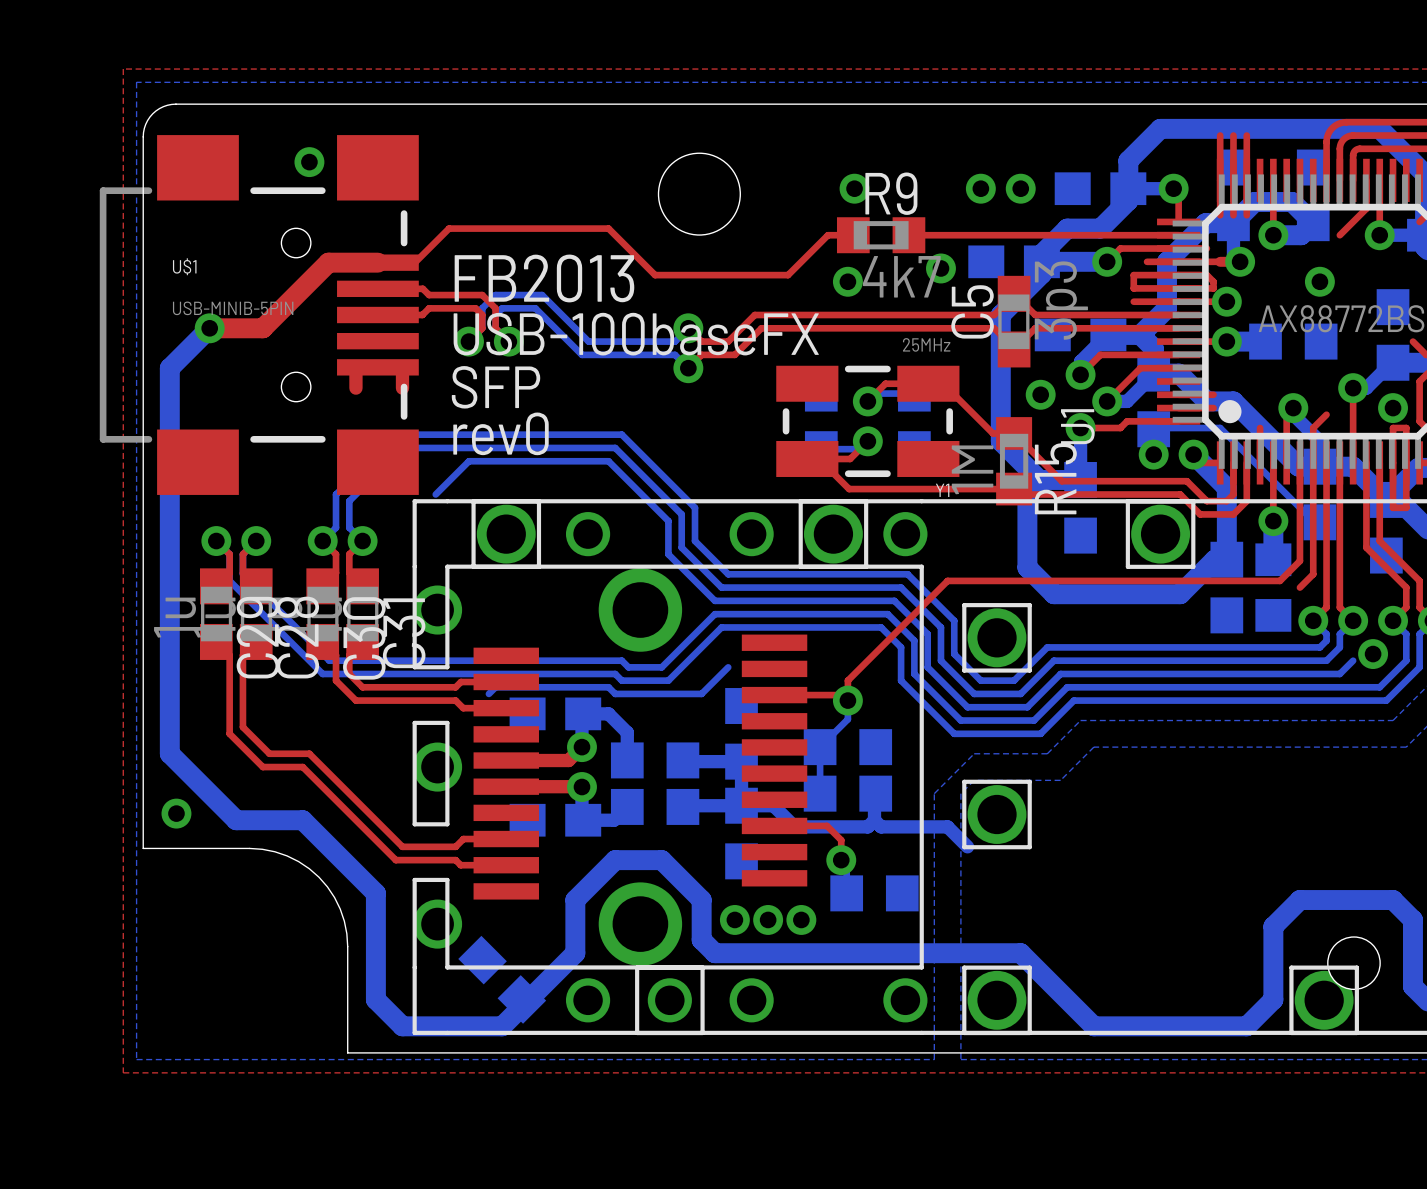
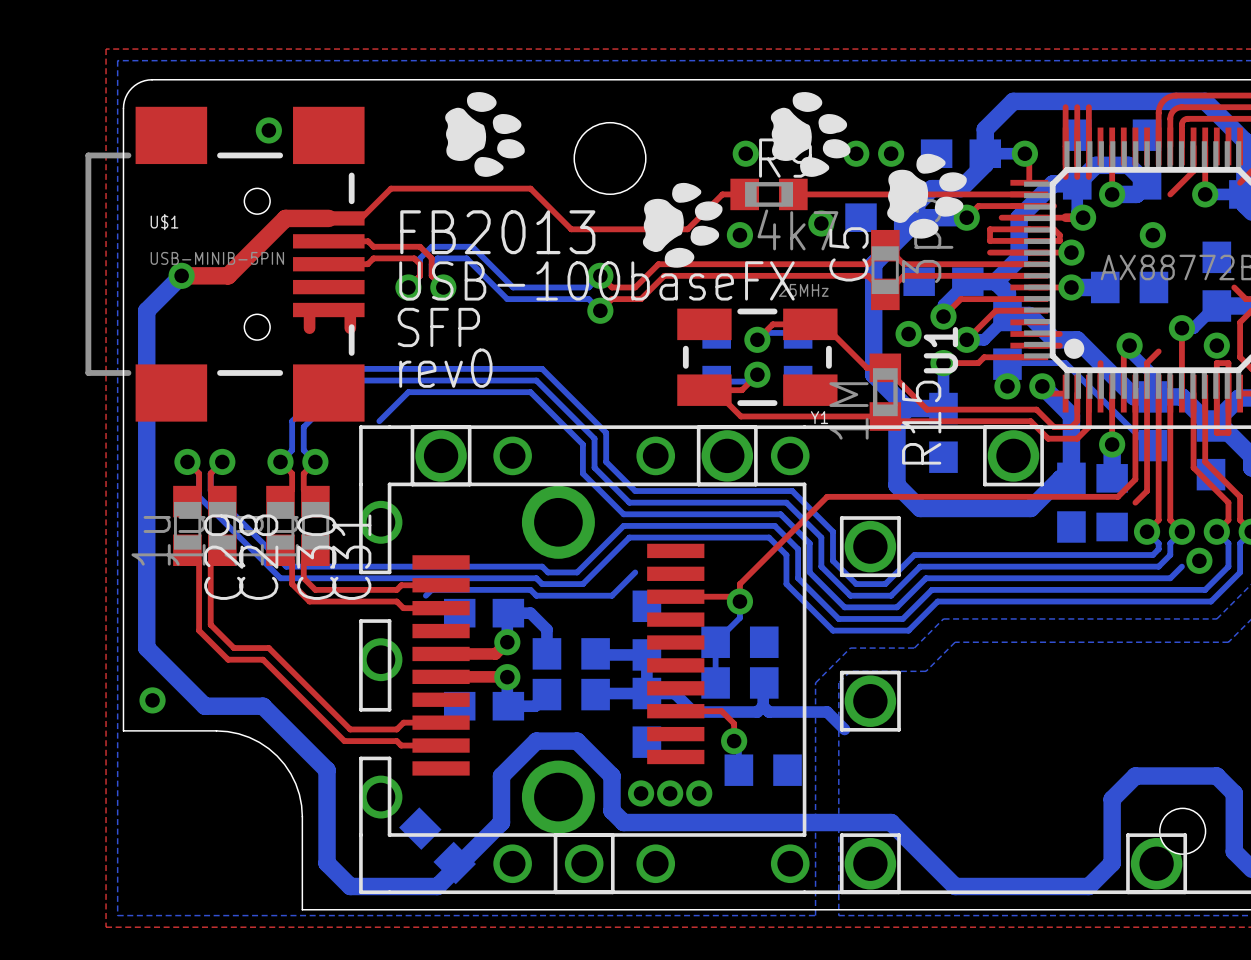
drawing: none -> [445, 92, 525, 177]
drawing: none -> [770, 92, 851, 177]
drawing: none -> [887, 153, 967, 239]
drawing: none -> [642, 182, 723, 268]

